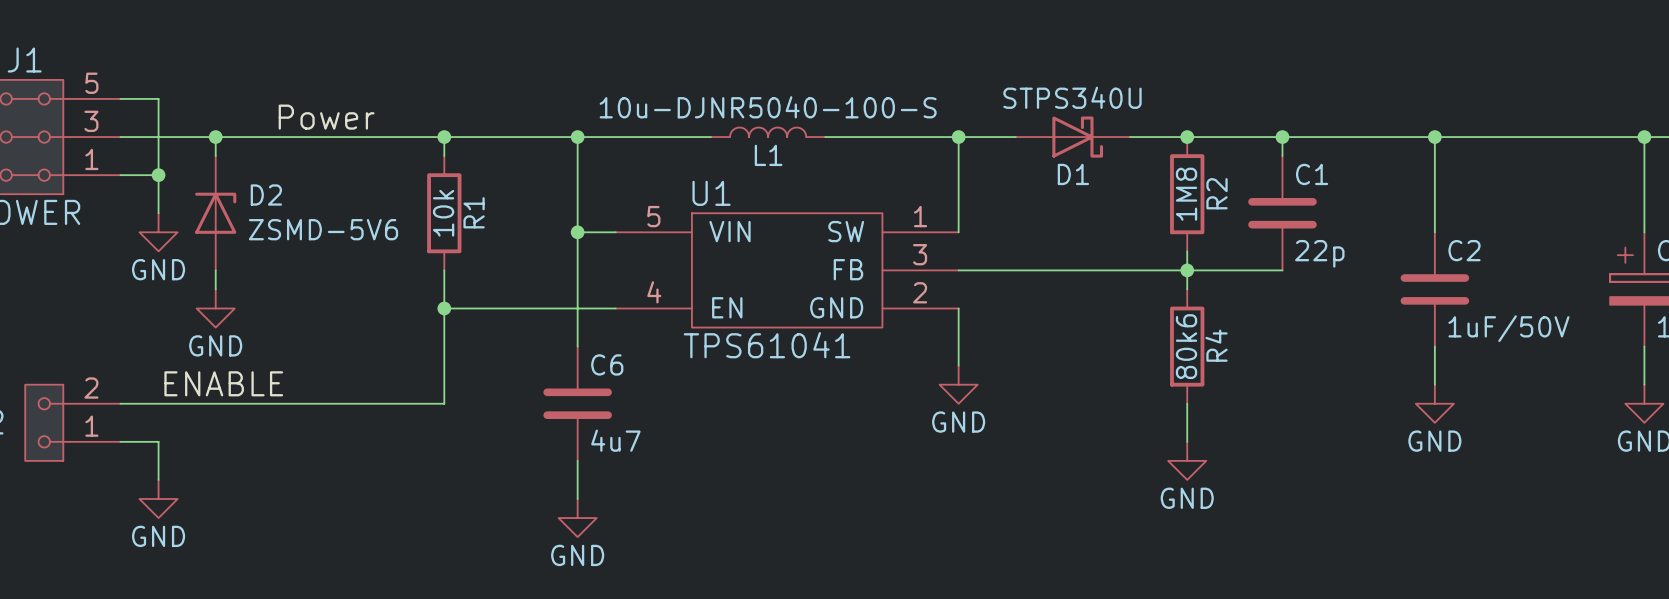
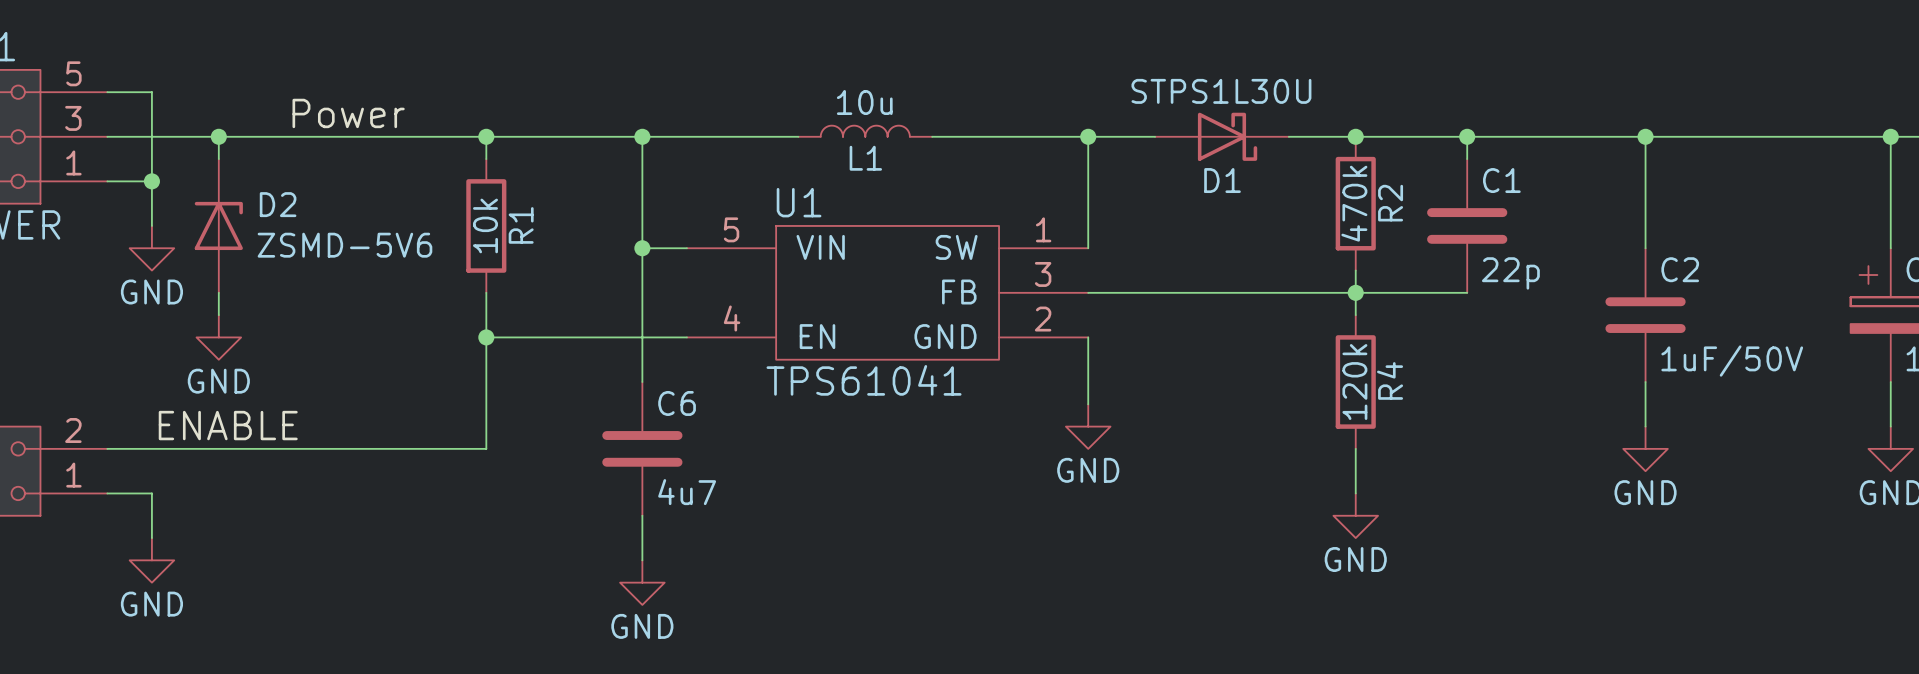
D1 value: STPS340U (1072, 97) -> STPS1L30U (1221, 91)
L1 value: 10u-DJNR5040-100-S (768, 107) -> 10u (864, 102)
R2 value: 1M8 (1186, 194) -> 470k (1354, 203)
R4 value: 80k6 (1186, 346) -> 120k (1354, 382)

